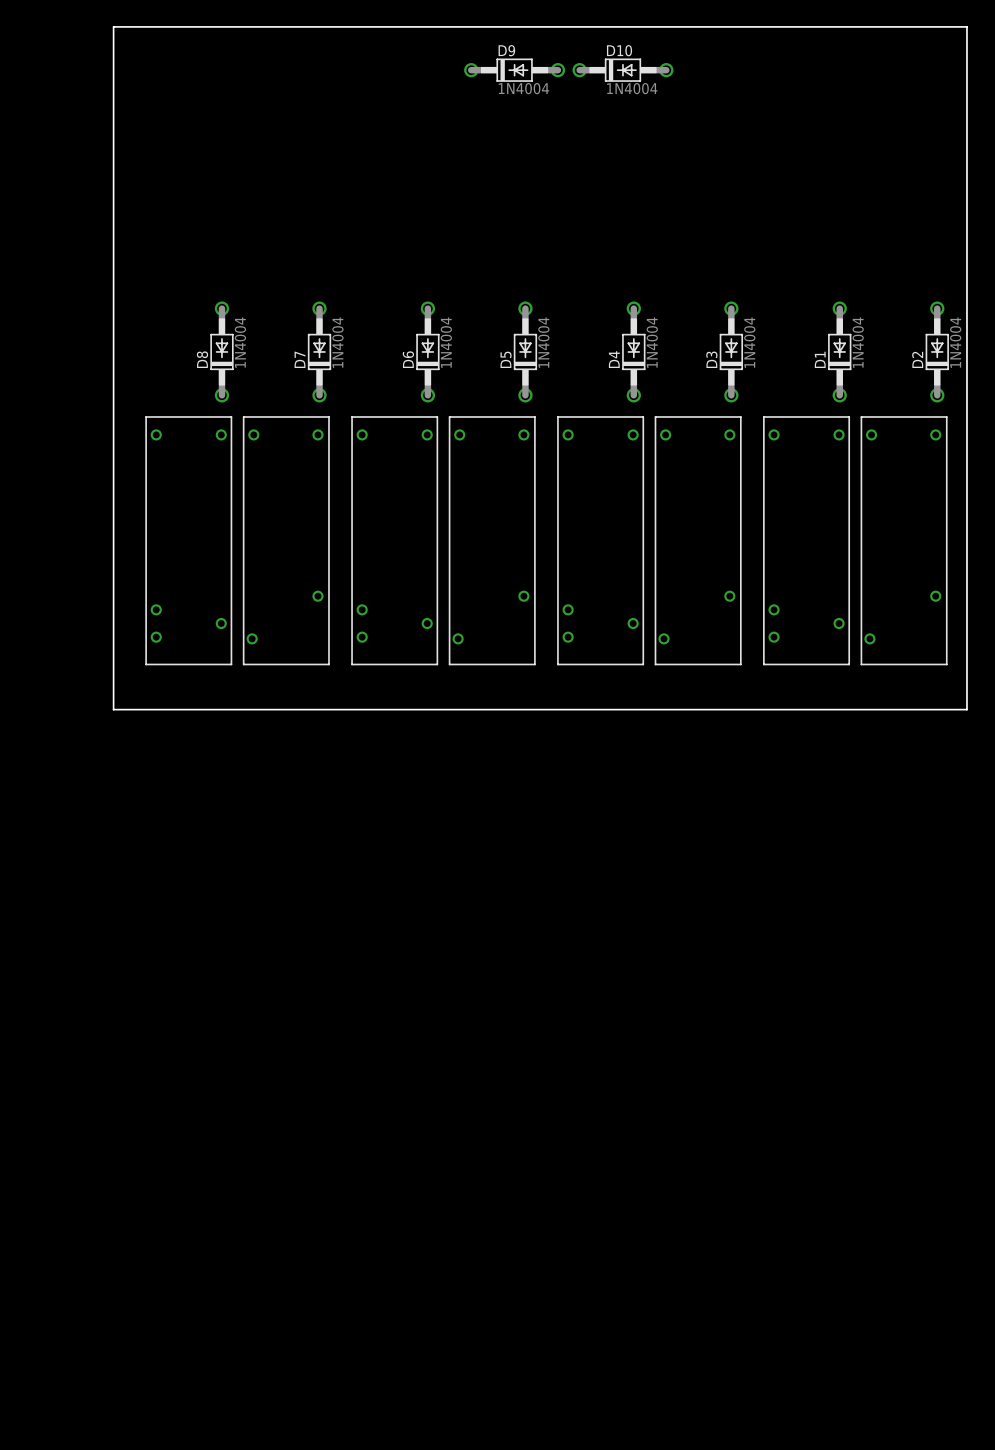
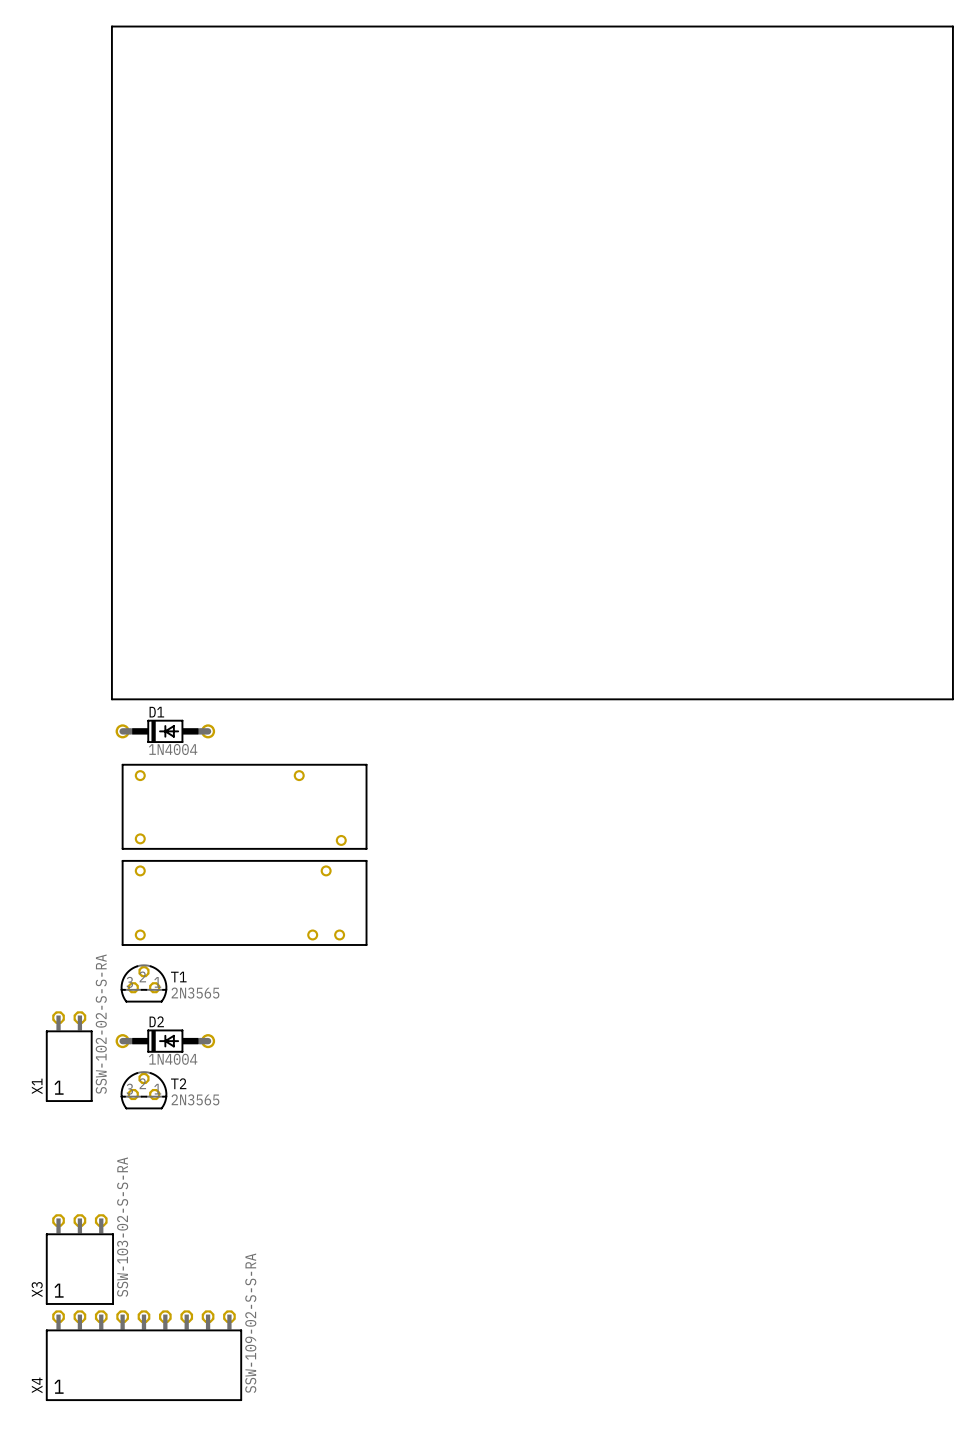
D9: 1N4004 (514, 70) -> none
D10: 1N4004 (622, 70) -> none
D8: 1N4004 (221, 351) -> none
D7: 1N4004 (319, 351) -> none
D6: 1N4004 (427, 351) -> none
D5: 1N4004 (525, 351) -> none
D4: 1N4004 (633, 351) -> none
D3: 1N4004 (731, 351) -> none
D1 rotation: 0° (839, 351) -> 90° clockwise (165, 731)
D1 position: (839, 351) -> (165, 731)
D2 rotation: 0° (937, 351) -> 90° clockwise (165, 1041)
D2 position: (937, 351) -> (165, 1041)
part: (188, 540) -> none
part: (286, 540) -> none
part: (394, 540) -> none
part: (492, 540) -> none
part: (600, 540) -> none
part: (698, 540) -> none
part: (806, 540) -> none
part: (904, 540) -> none
part: none -> (244, 806)
part: none -> (244, 902)
T1: none -> 2N3565 (143, 983)
X1: none -> SSW-102-02-S-S-RA (69, 1056)
T2: none -> 2N3565 (143, 1090)
X3: none -> SSW-103-02-S-S-RA (79, 1259)
X4: none -> SSW-109-02-S-S-RA (143, 1355)

